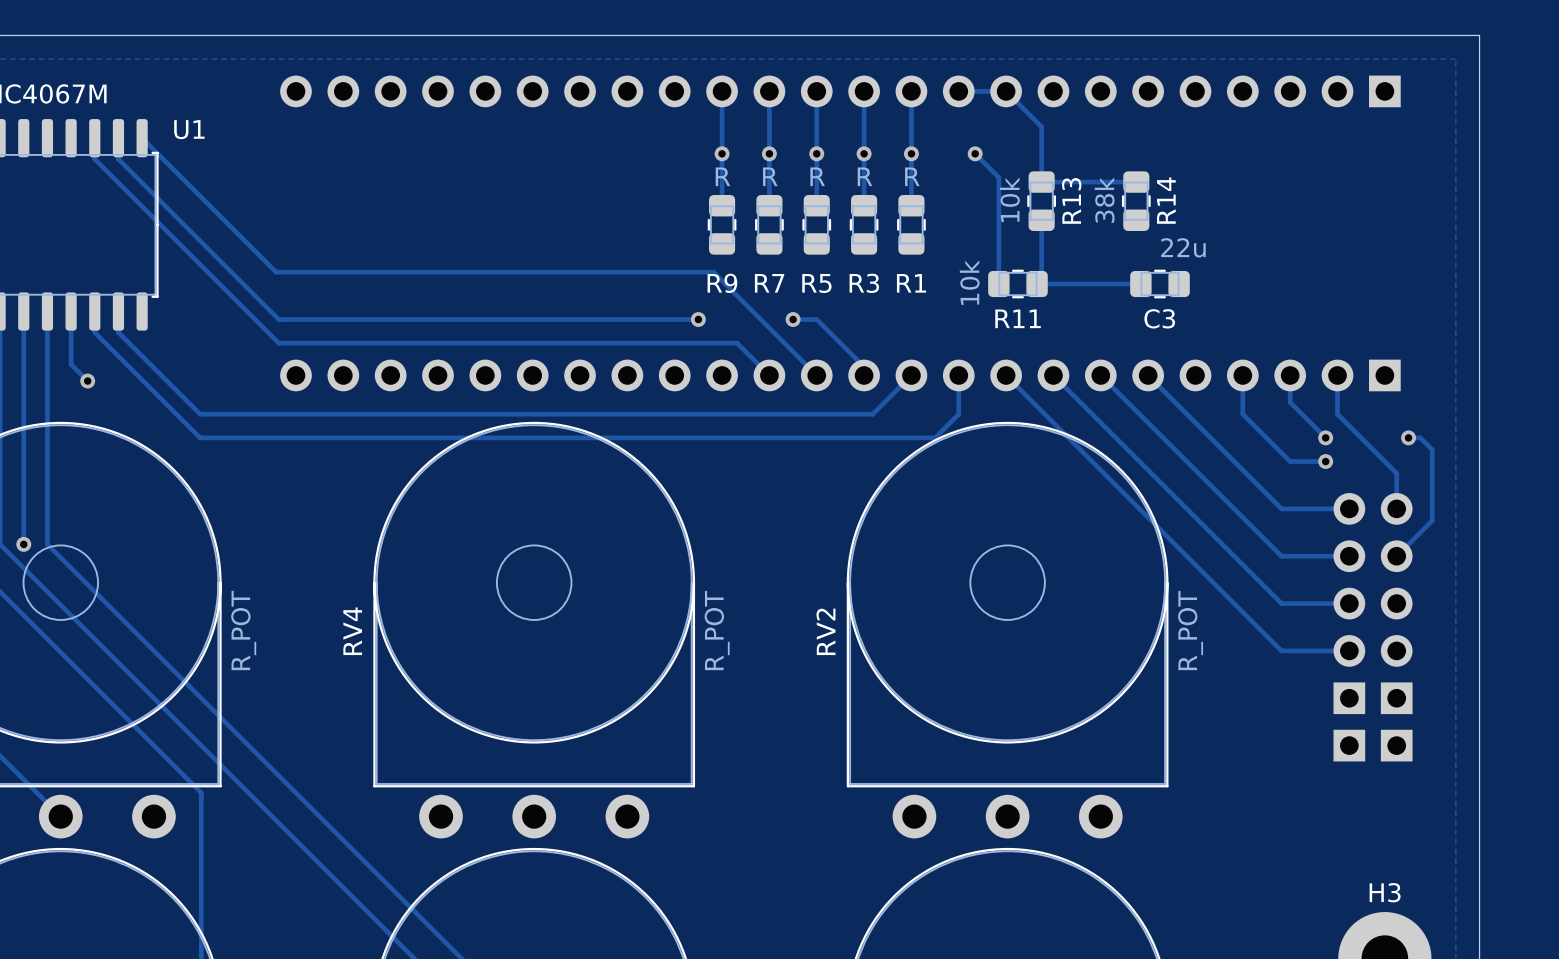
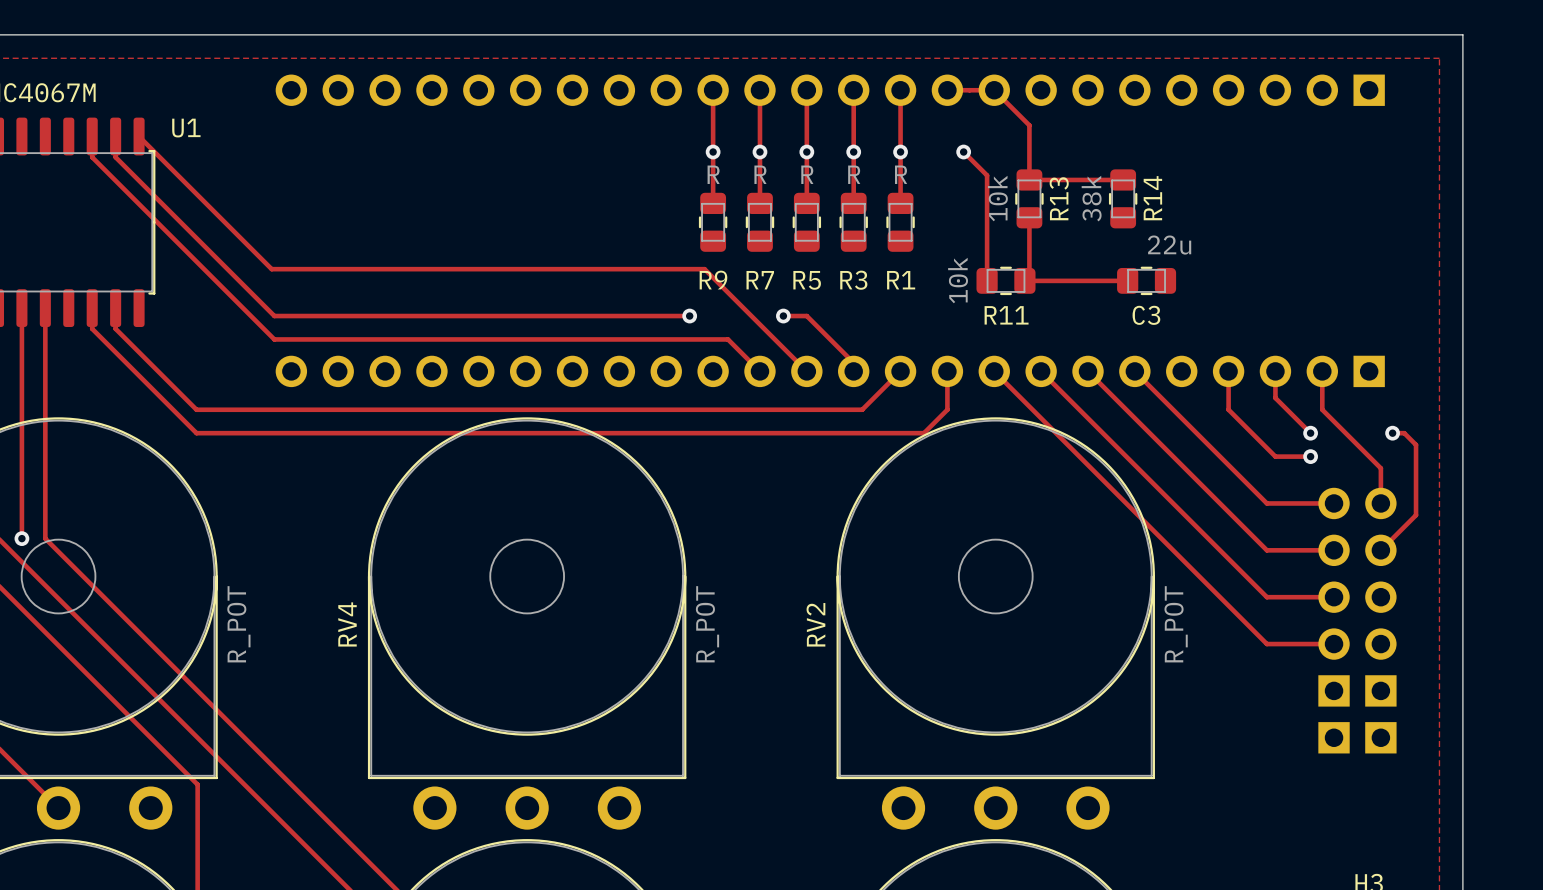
track: (71, 311) (71, 364) (87, 381) -> none
via: (87, 381) -> none

